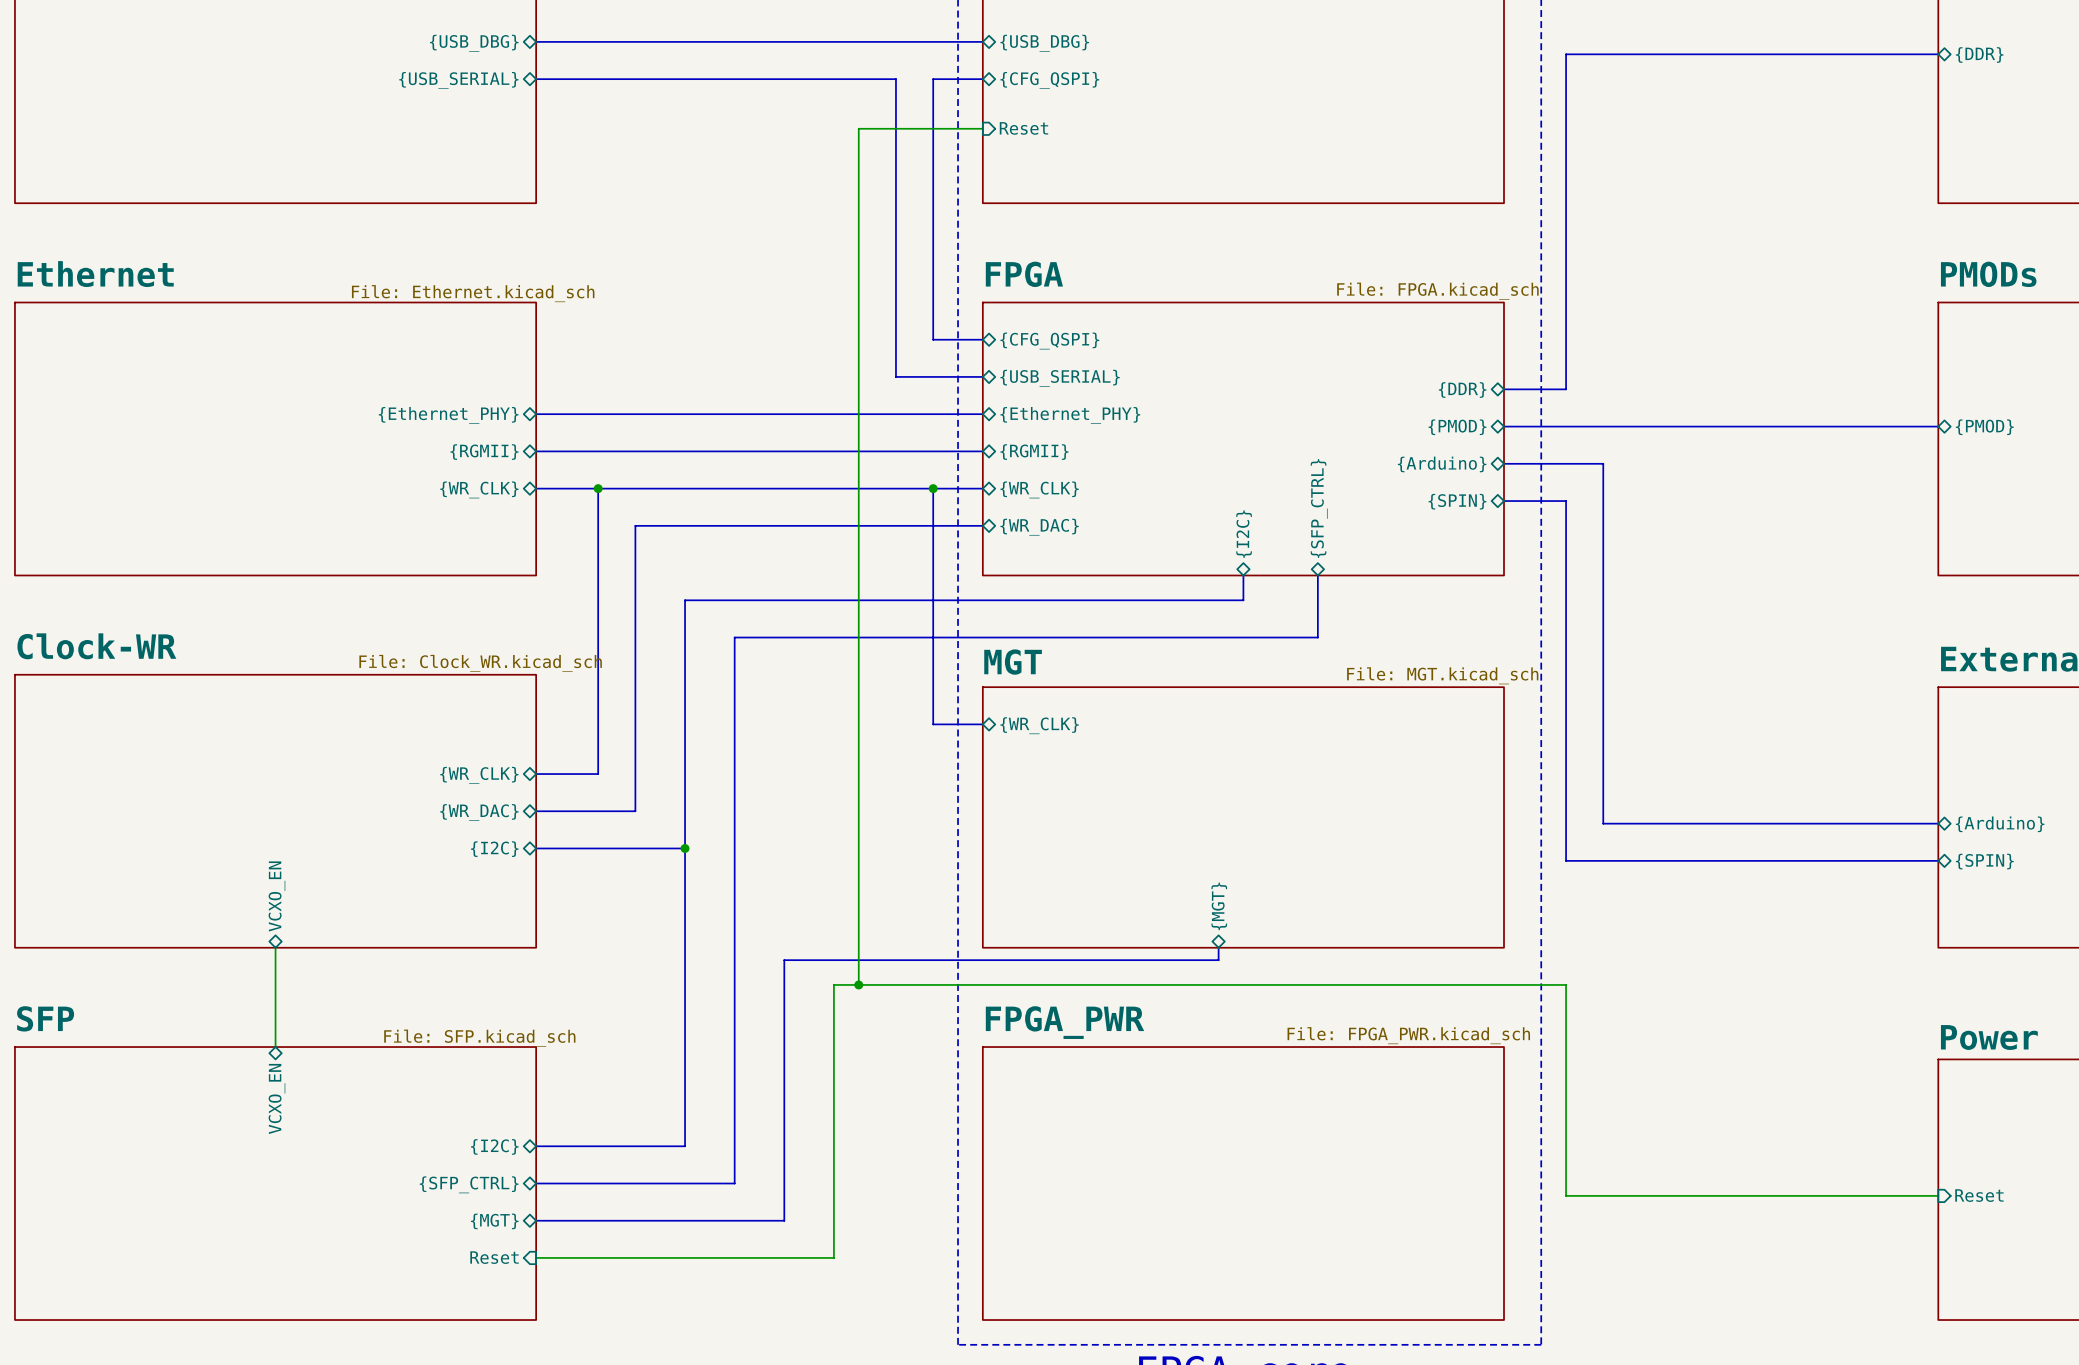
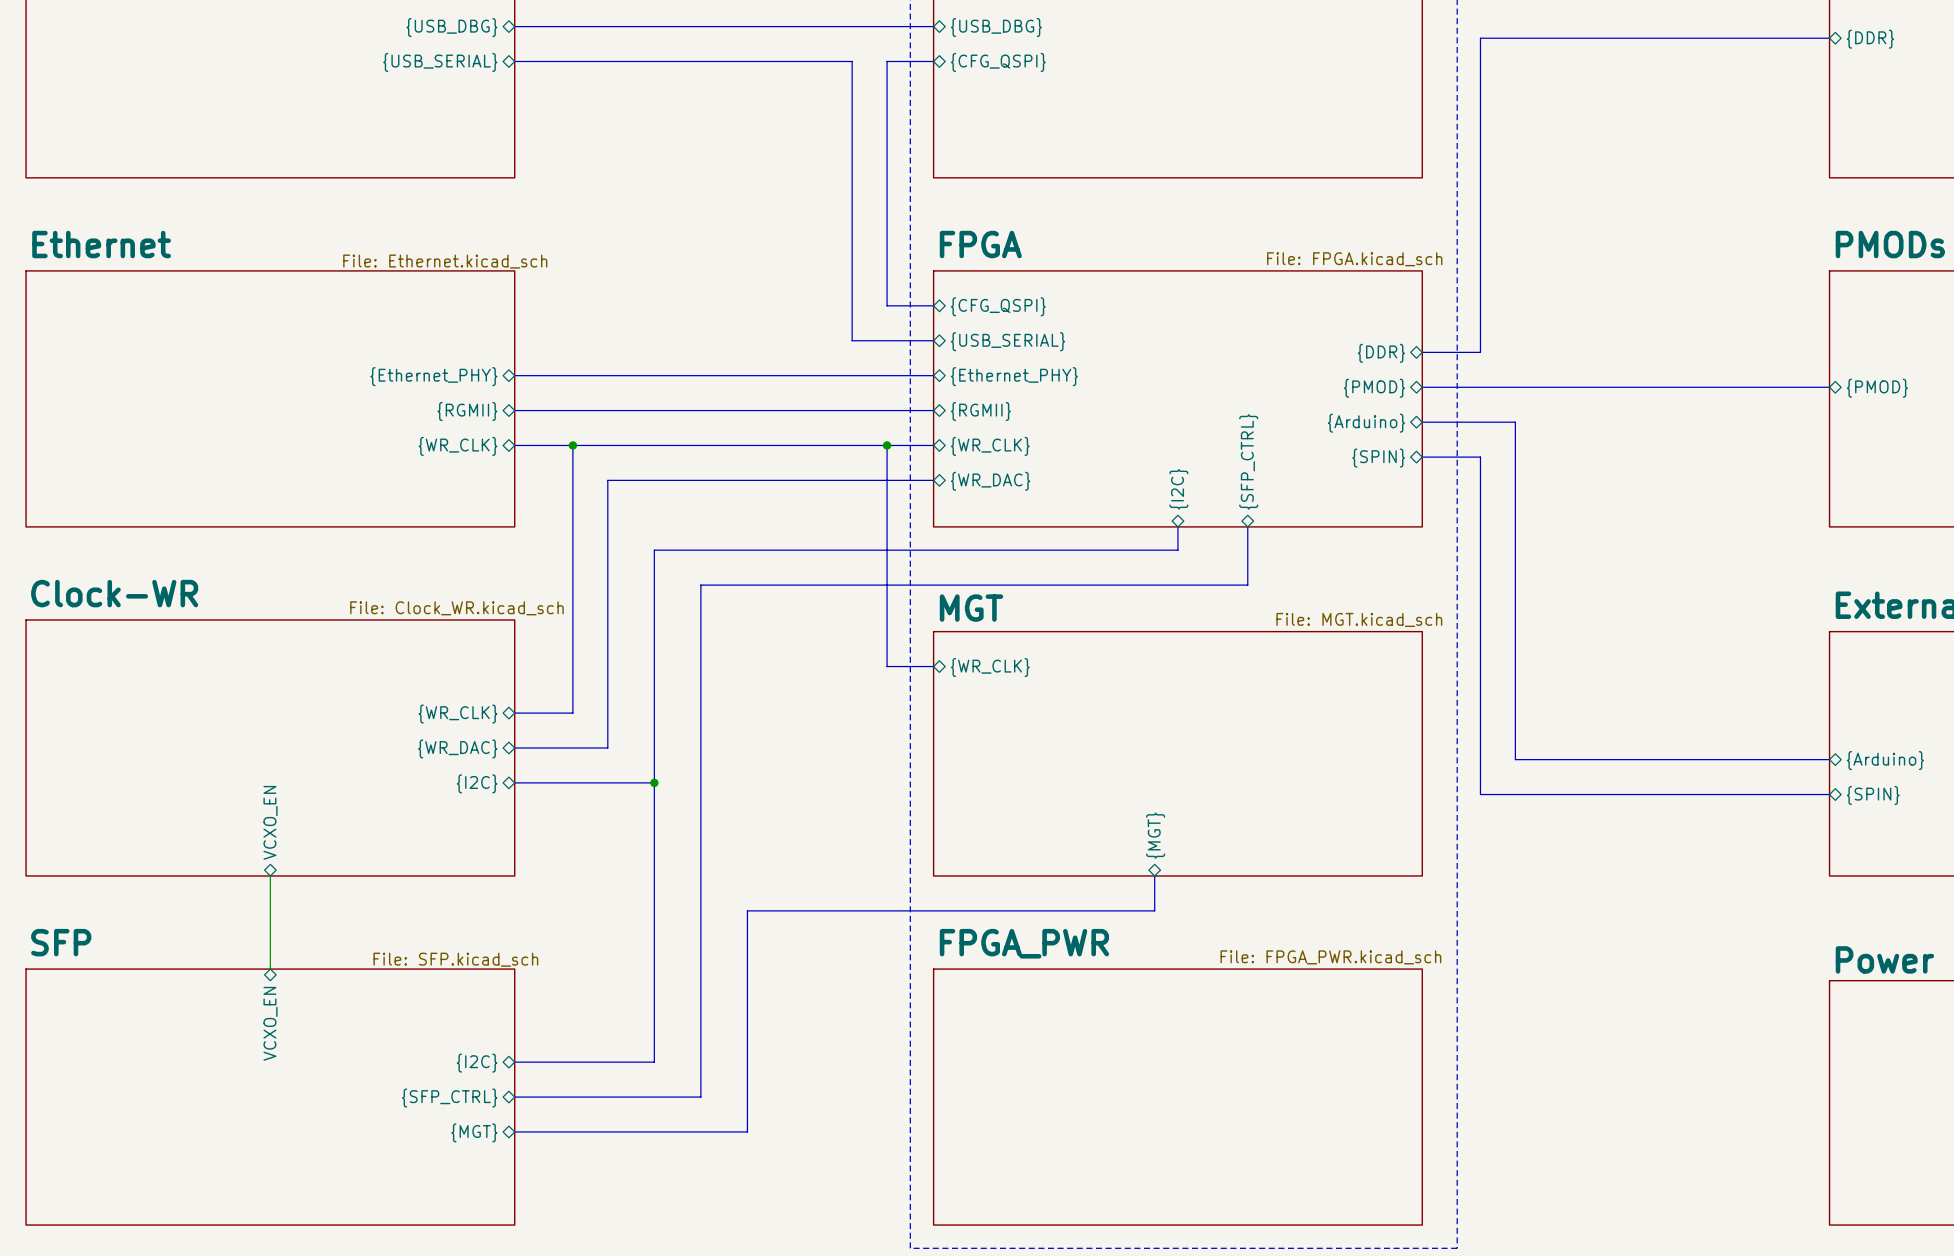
wire: (982, 128) (858, 128) (858, 984) -> none
sheet pin: Reset (1023, 128) -> none
bus: (1218, 960) (784, 960) (784, 984) -> (1154, 887) (1154, 910) (747, 910)
junction: (858, 984) -> none
wire: (1938, 1195) (1566, 1195) (1566, 984) (833, 984) (833, 1257) (536, 1257) -> none
sheet pin: Reset (1979, 1195) -> none
sheet pin: Reset (494, 1257) -> none

